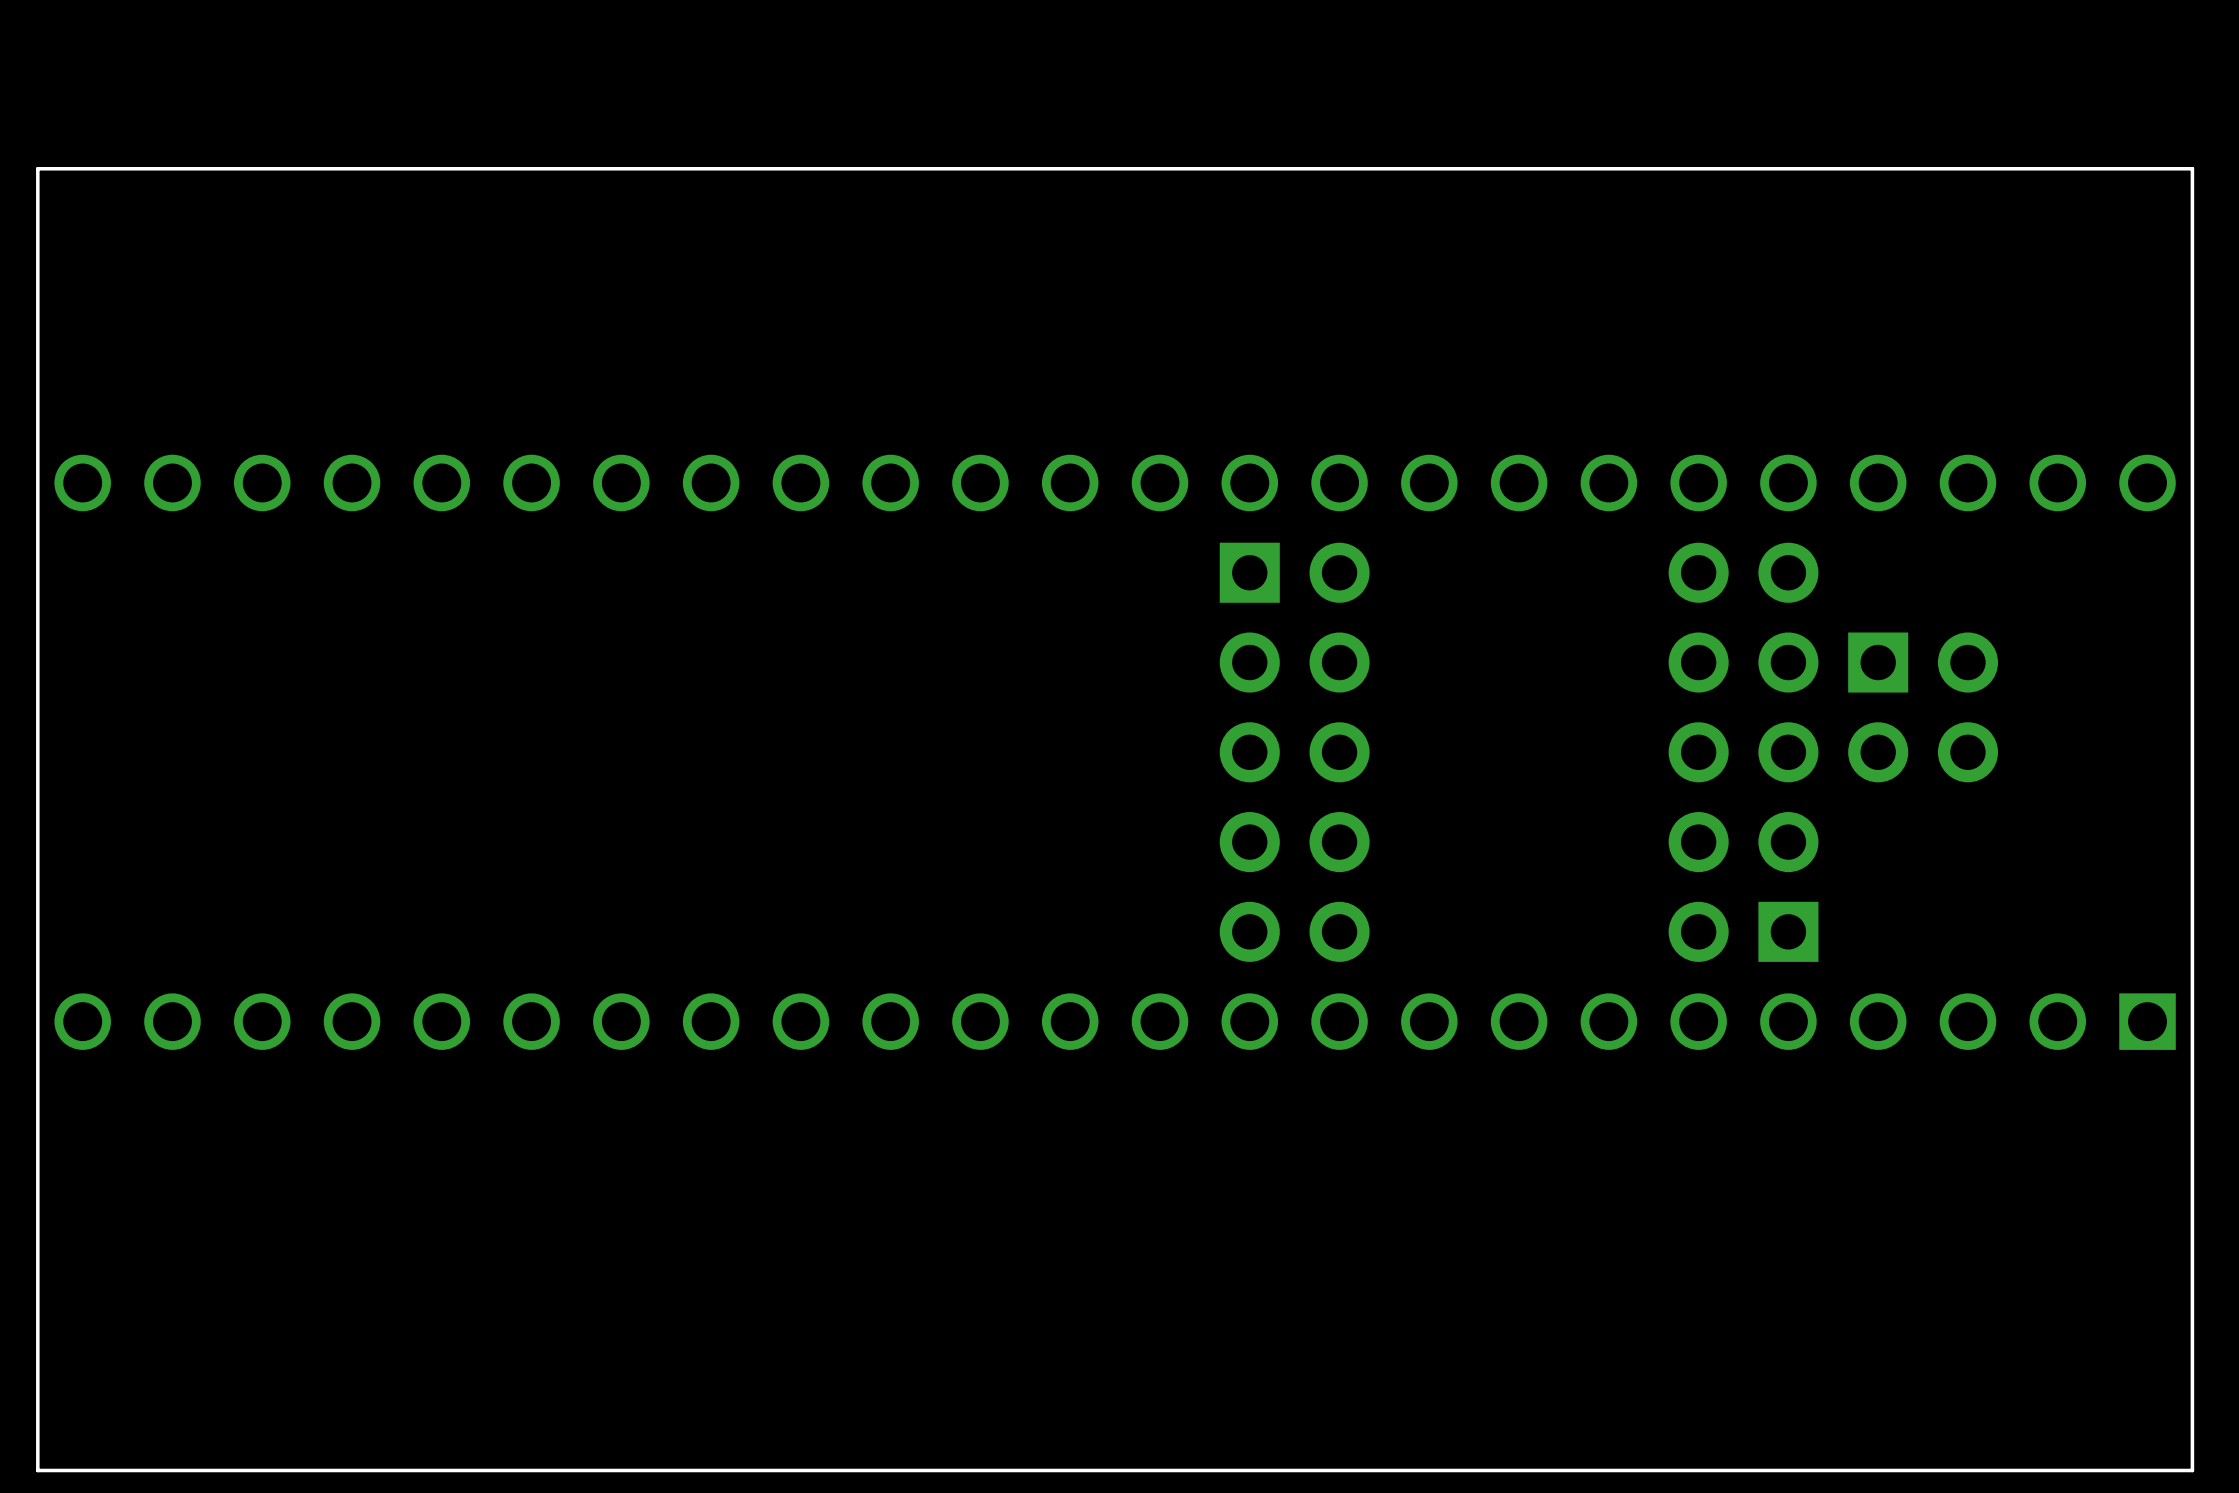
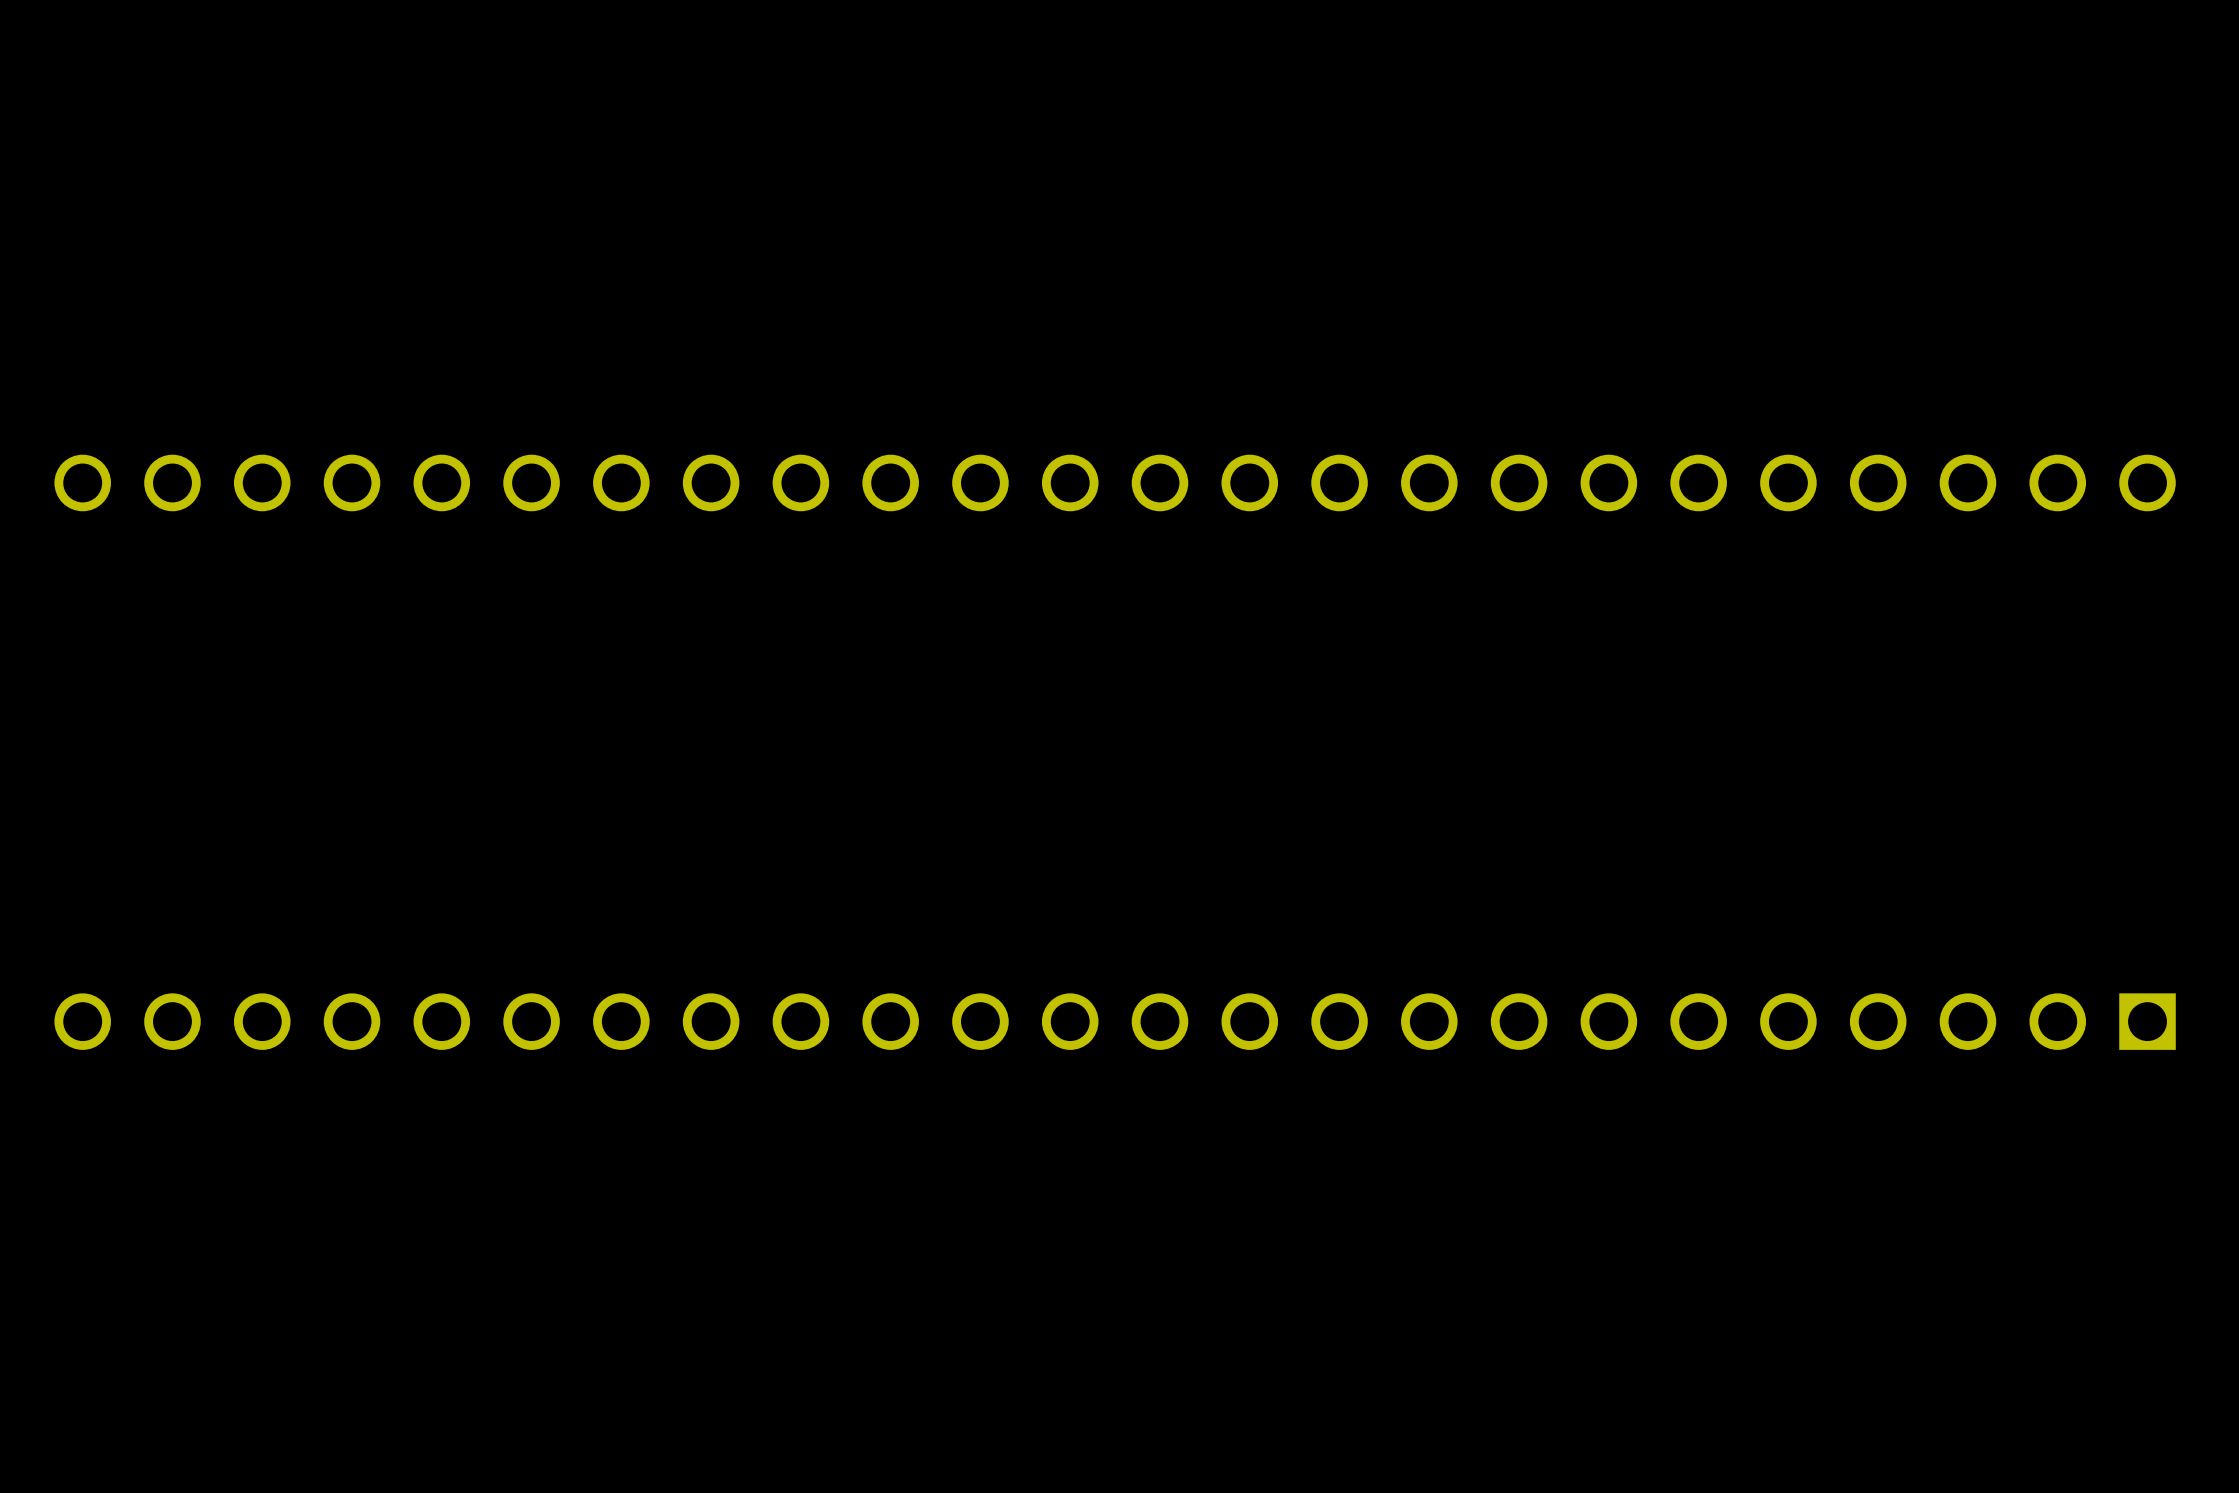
board edge: (2192, 168) (2192, 1470) (37, 1470) (37, 168) (2192, 168) -> none
part: (1923, 707) -> none
part: (1294, 752) -> none
part: (1743, 752) -> none

